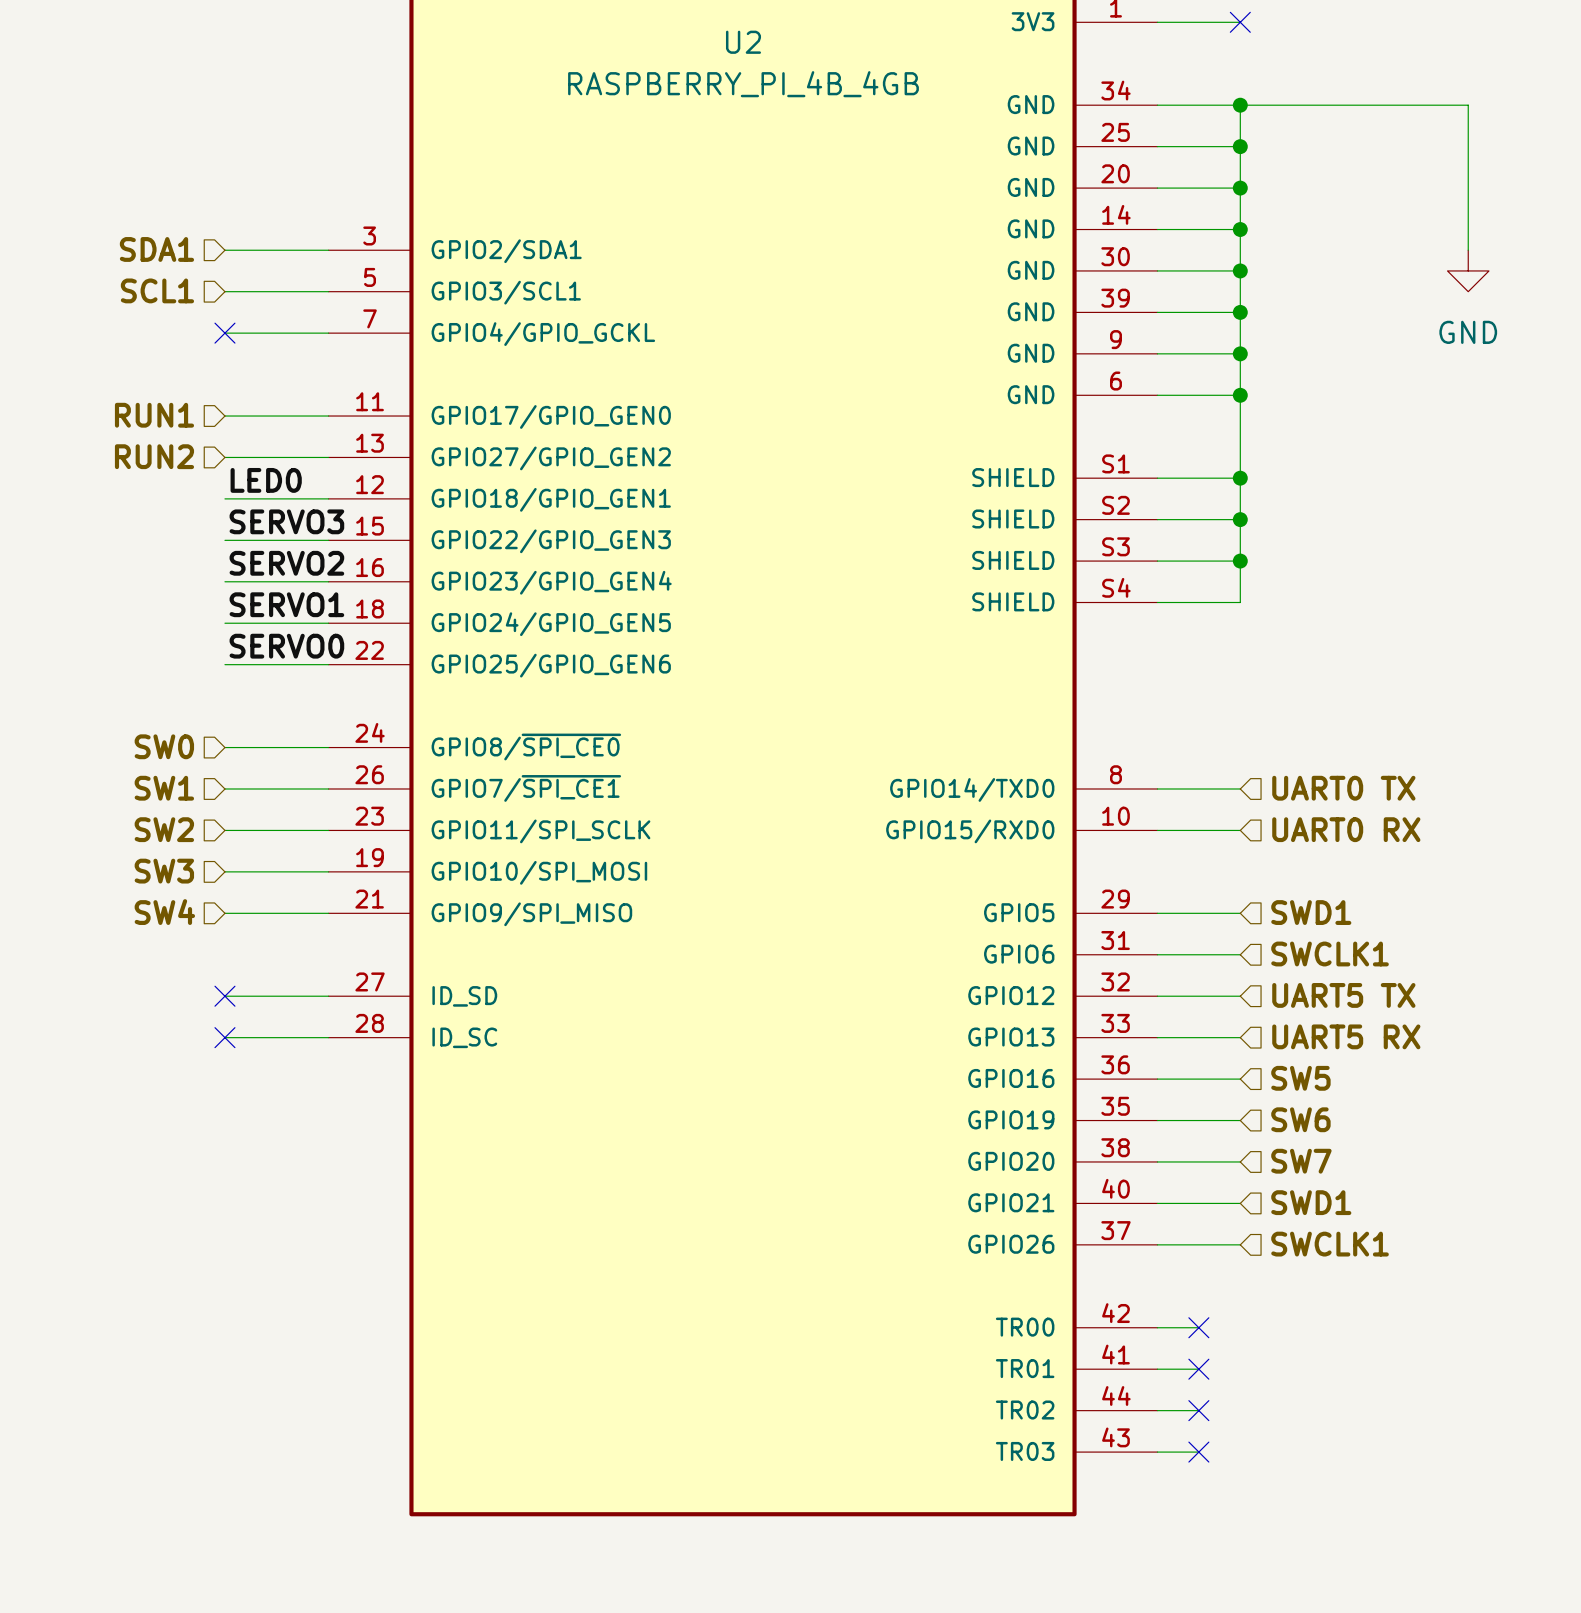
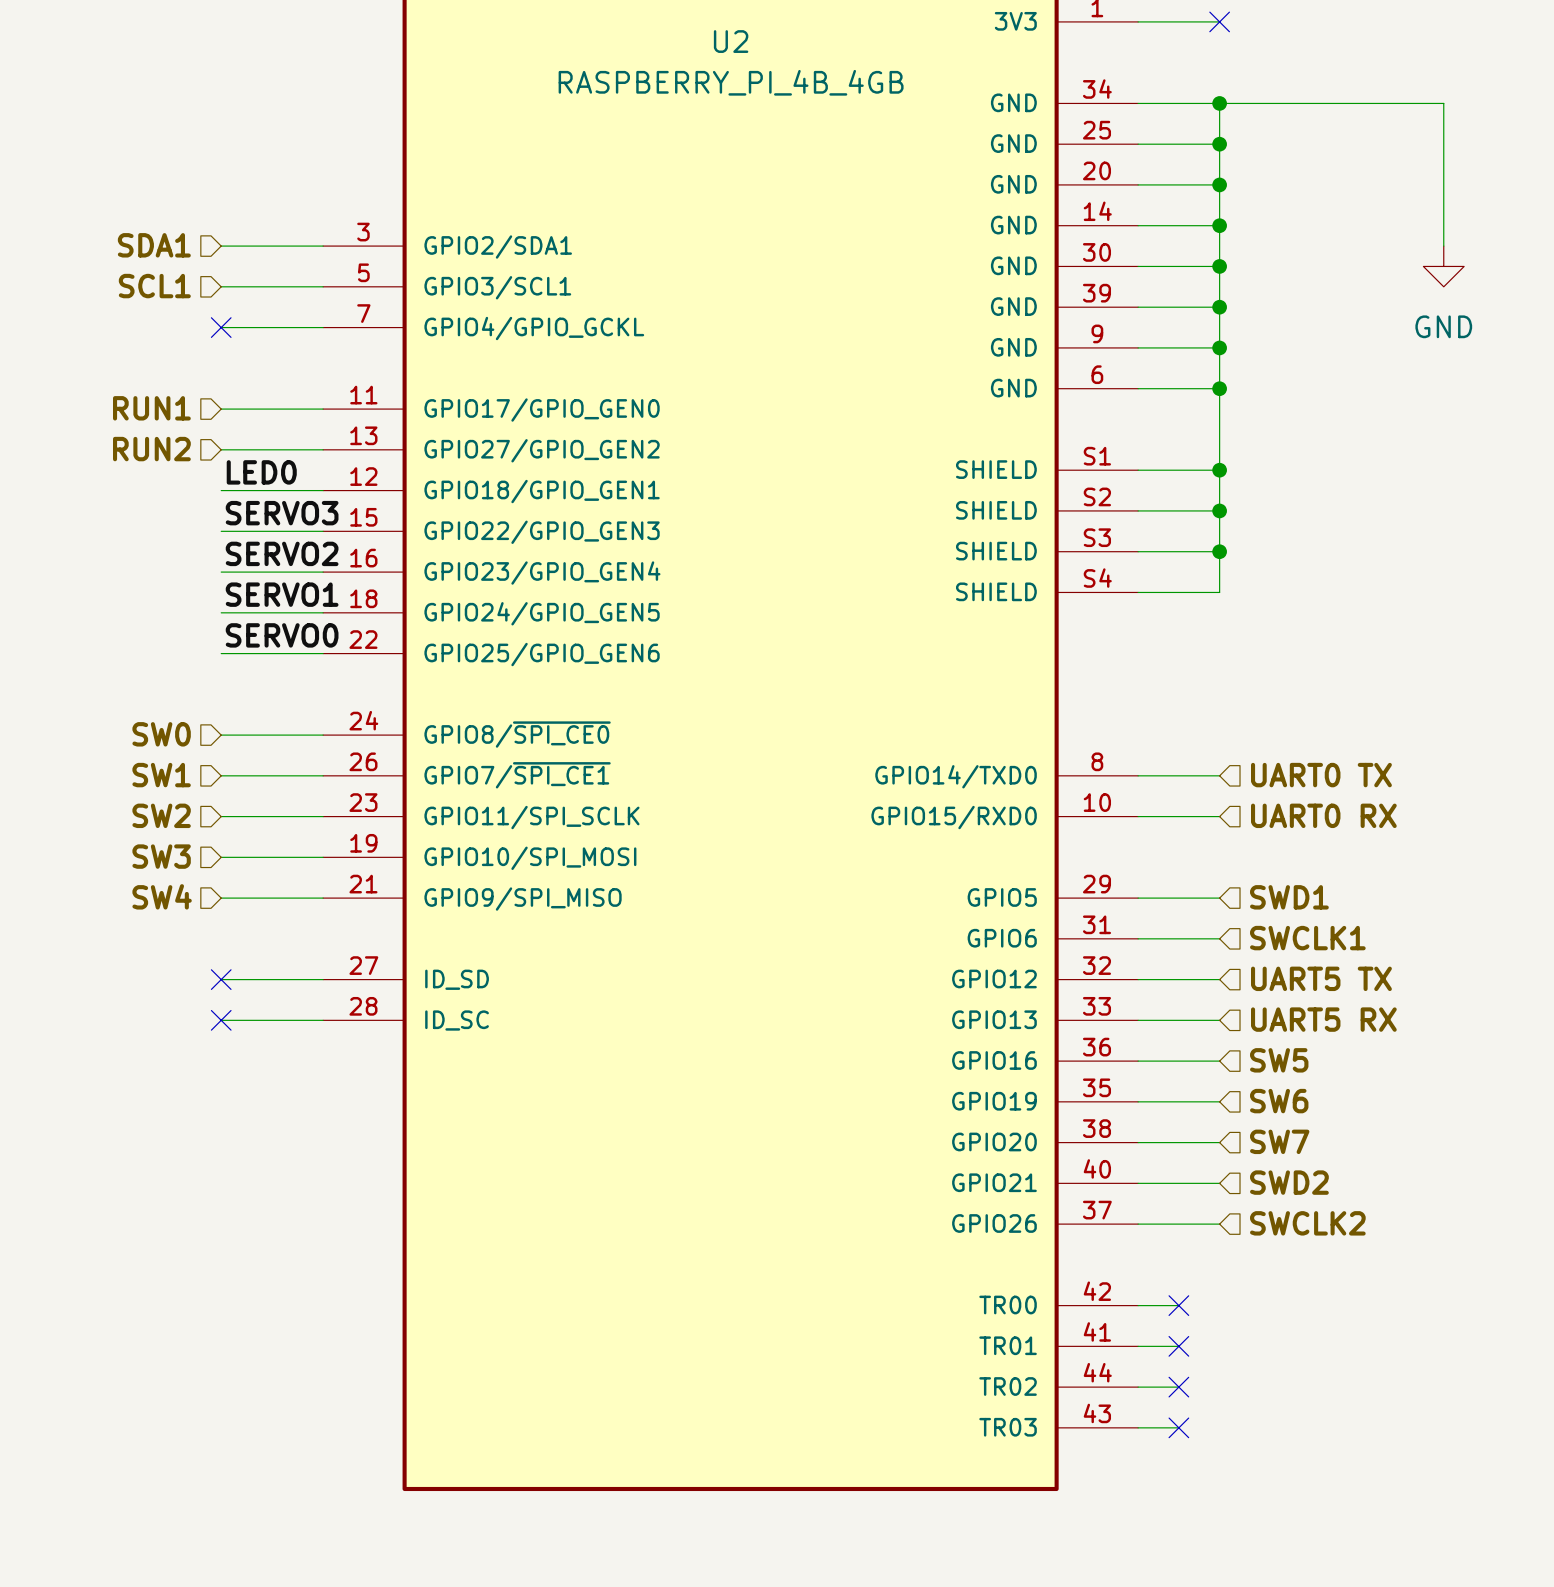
hierarchical label: SWD1 (1311, 1202) -> SWD2 (1289, 1182)
hierarchical label: SWCLK1 (1330, 1244) -> SWCLK2 (1307, 1223)

